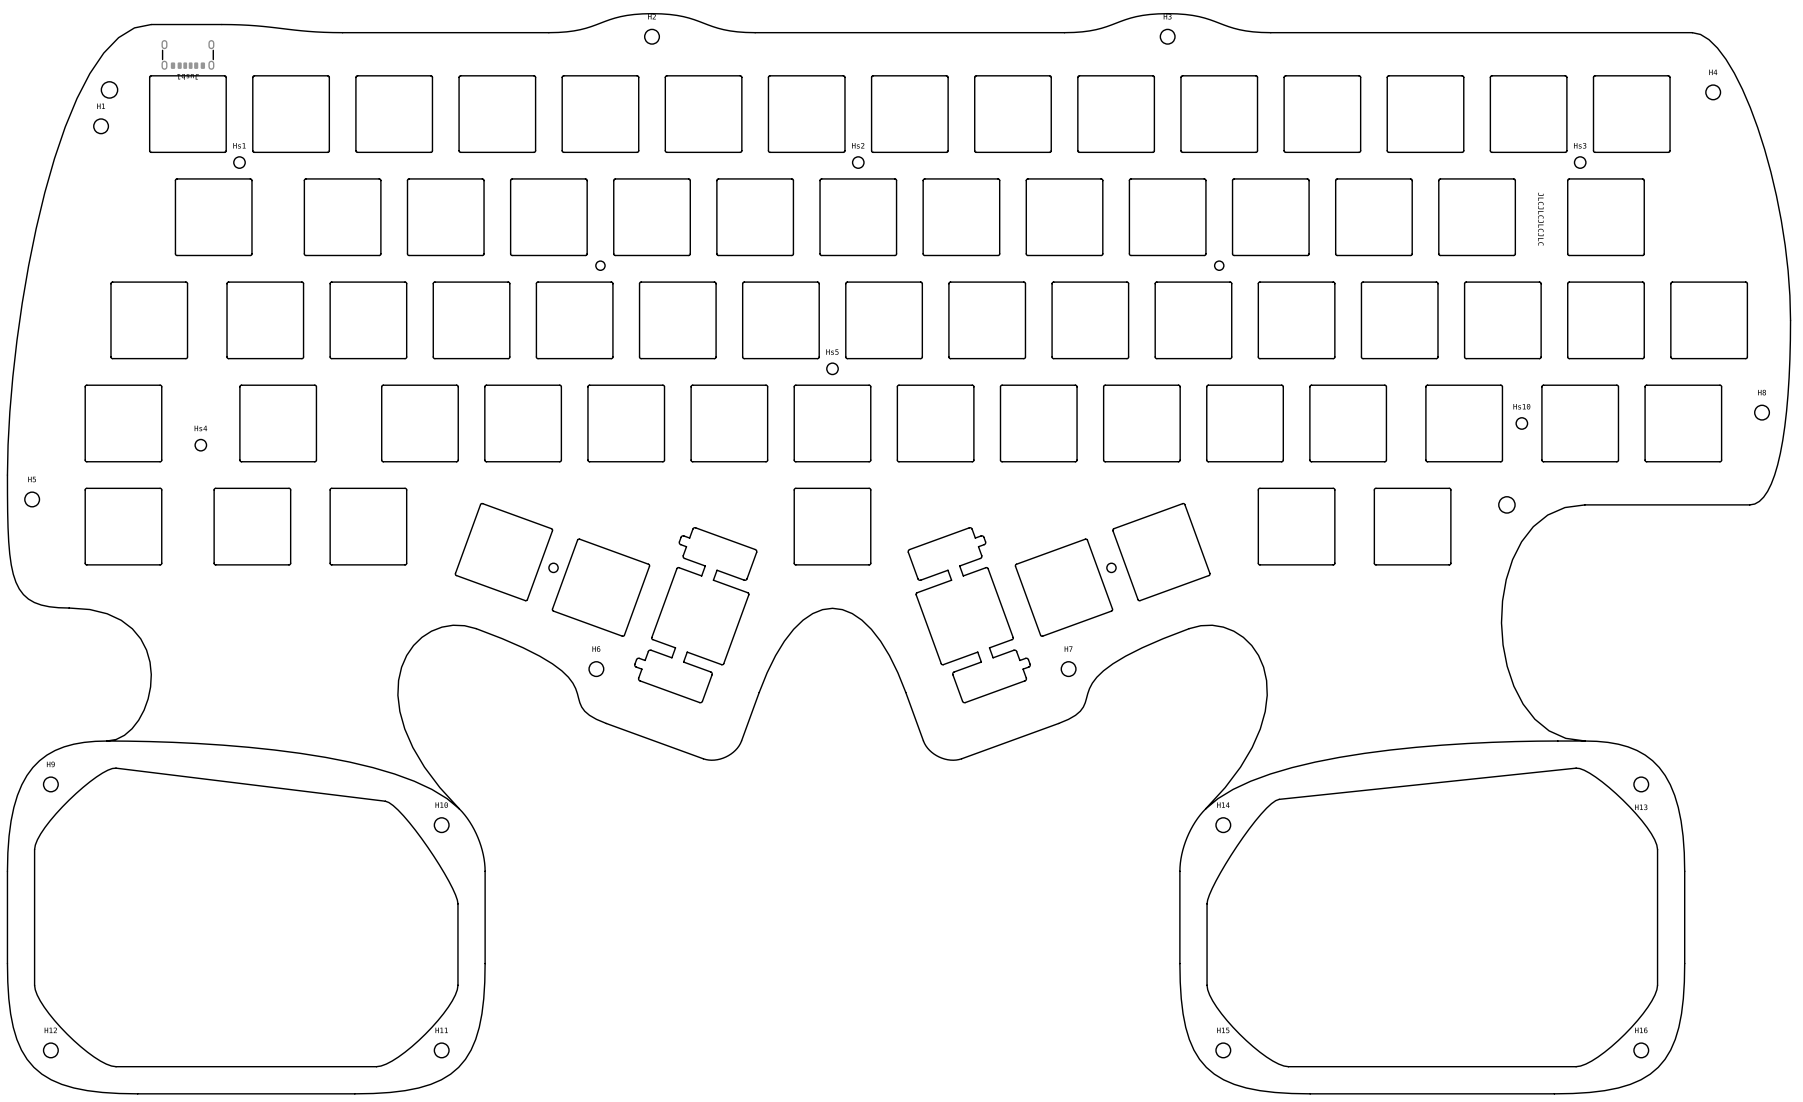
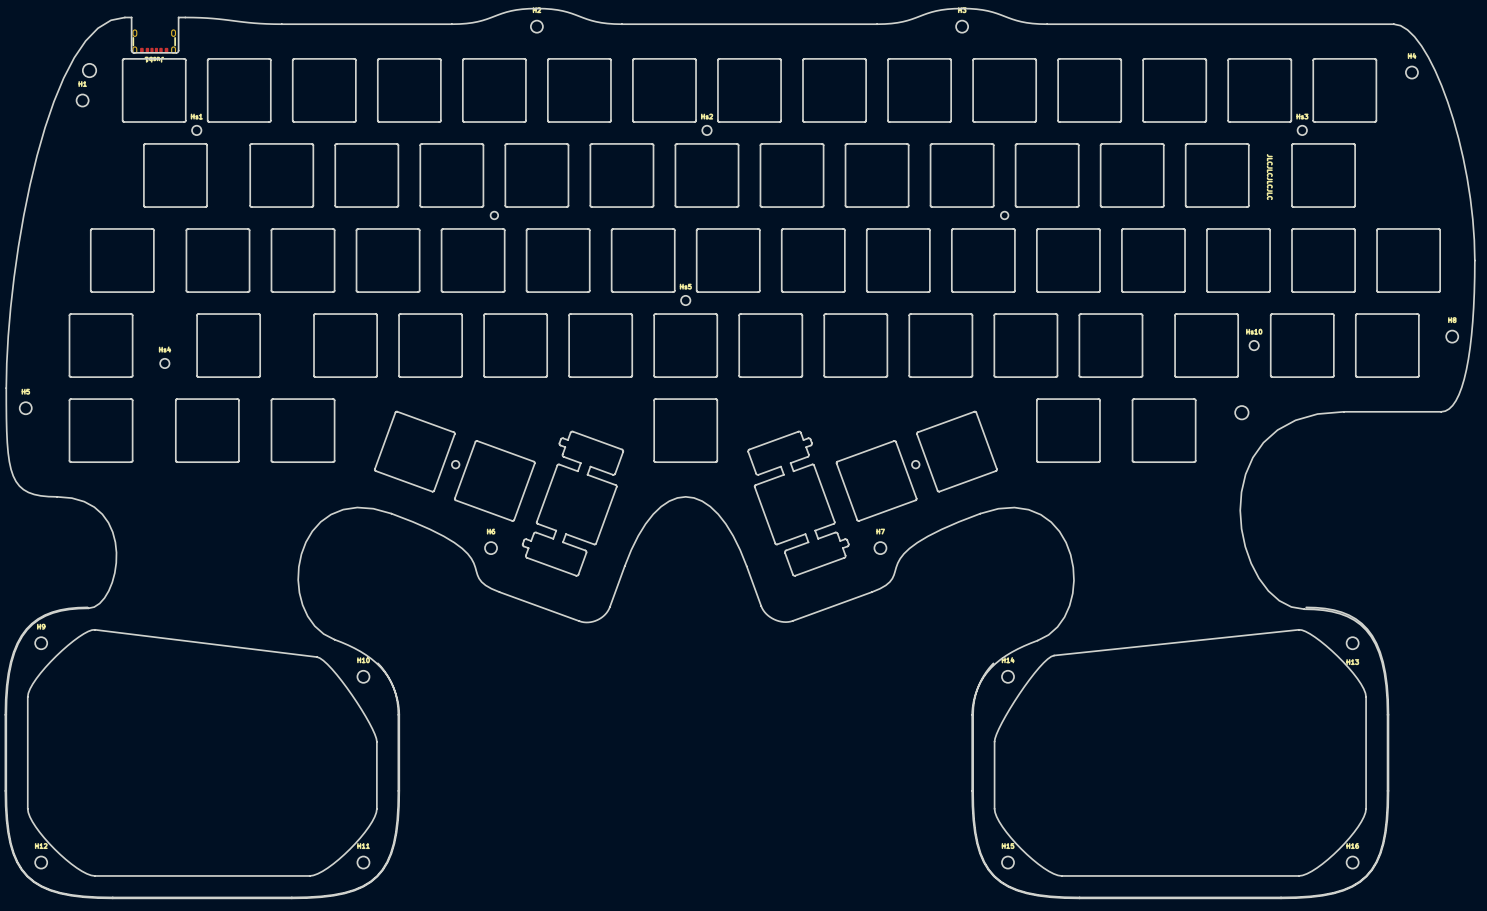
board edge: (652, 13) (627, 15) (580, 29) (548, 32) (332, 32) (240, 24) (151, 24) (134, 27) (118, 37) (103, 53) (89, 73) (65, 127) (54, 158) (36, 228) (22, 303) (12, 377) (8, 444) (7, 494) (11, 564) (15, 582) (23, 594) (41, 605) (89, 609) (107, 613) (121, 620) (132, 628) (146, 650) (151, 674) (150, 686) (144, 710) (132, 728) (124, 735) (107, 741) (222, 745) (325, 757) (372, 767) (414, 781) (447, 798) (459, 808) (424, 767) (412, 747) (399, 711) (397, 695) (401, 667) (413, 645) (431, 631) (453, 625) (464, 625) (523, 647) (552, 663) (568, 677) (575, 688) (581, 707) (589, 715) (606, 723) (703, 758) (714, 760) (728, 755) (739, 745) (767, 672) (775, 655) (793, 629) (812, 613) (832, 608) (852, 613) (871, 629) (889, 655) (897, 672) (925, 745) (939, 757) (956, 760) (1068, 719) (1083, 707) (1089, 688) (1096, 677) (1112, 663) (1163, 638) (1189, 628) (1212, 625) (1233, 631) (1251, 645) (1263, 667) (1267, 695) (1260, 728) (1252, 747) (1225, 787) (1205, 808) (1217, 798) (1250, 781) (1292, 767) (1339, 757) (1442, 745) (1584, 741) (1565, 738) (1549, 730) (1534, 719) (1523, 704) (1513, 686) (1507, 666) (1503, 644) (1502, 600) (1512, 559) (1521, 541) (1533, 526) (1547, 515) (1564, 507) (1584, 504) (1749, 504) (1759, 501) (1771, 483) (1782, 440) (1789, 359) (1789, 295) (1781, 220) (1764, 149) (1742, 89) (1717, 48) (1700, 34) (1692, 32) (1261, 32) (1239, 29) (1199, 16) (1167, 13) (1136, 16) (1101, 28) (1074, 32) (755, 32) (730, 30) (683, 16) (652, 13) -> (57, 496) (84, 501) (102, 514) (112, 532) (116, 552) (114, 573) (104, 598) (94, 607) (53, 613) (32, 624) (18, 643) (9, 673) (6, 714) (6, 806) (8, 832) (13, 853) (22, 869) (34, 881) (50, 889) (71, 894) (97, 897) (320, 896) (344, 892) (362, 886) (382, 869) (390, 853) (397, 819) (398, 714) (395, 694) (388, 676) (376, 662) (360, 651) (323, 634) (314, 626) (307, 616) (299, 592) (298, 566) (305, 542) (320, 521) (331, 514) (343, 509) (357, 507) (373, 508) (412, 521) (443, 536) (462, 548) (471, 558) (479, 578) (491, 588) (579, 621) (588, 622) (599, 618) (607, 611) (631, 549) (645, 523) (661, 506) (669, 501) (685, 496) (702, 501) (710, 506) (725, 523) (740, 549) (763, 610) (772, 618) (783, 622) (792, 620) (880, 588) (892, 578) (900, 558) (909, 548) (927, 536) (959, 521) (998, 508) (1014, 507) (1028, 509) (1040, 514) (1051, 522) (1066, 542) (1073, 567) (1072, 593) (1064, 617) (1057, 626) (1048, 634) (1011, 652) (995, 663) (983, 677) (975, 694) (973, 714) (974, 819) (980, 853) (988, 869) (1008, 886) (1027, 892) (1050, 896) (1281, 897) (1333, 892) (1352, 886) (1366, 876) (1376, 862) (1382, 843) (1387, 806) (1387, 714) (1386, 685) (1382, 662) (1371, 636) (1354, 620) (1332, 611) (1291, 606) (1279, 600) (1268, 590) (1258, 578) (1245, 546) (1240, 510) (1241, 492) (1245, 474) (1252, 457) (1263, 442) (1277, 430) (1295, 420) (1317, 414) (1343, 411) (1441, 411) (1449, 408) (1455, 400) (1461, 387) (1468, 359) (1474, 276) (1474, 240) (1470, 198) (1458, 138) (1441, 85) (1428, 57) (1407, 29) (1393, 24) (1039, 24) (1021, 21) (987, 10) (962, 8) (936, 10) (907, 20) (884, 24) (621, 24) (596, 21) (557, 9) (529, 8) (511, 10) (482, 20) (459, 24) (273, 24) (178, 17) (177, 52) (133, 52) (131, 50) (131, 17) (111, 20) (97, 28) (85, 40) (74, 57) (53, 101) (29, 185) (18, 246) (10, 307) (6, 404) (7, 442) (11, 469) (16, 481) (23, 489) (34, 494) (57, 496)

